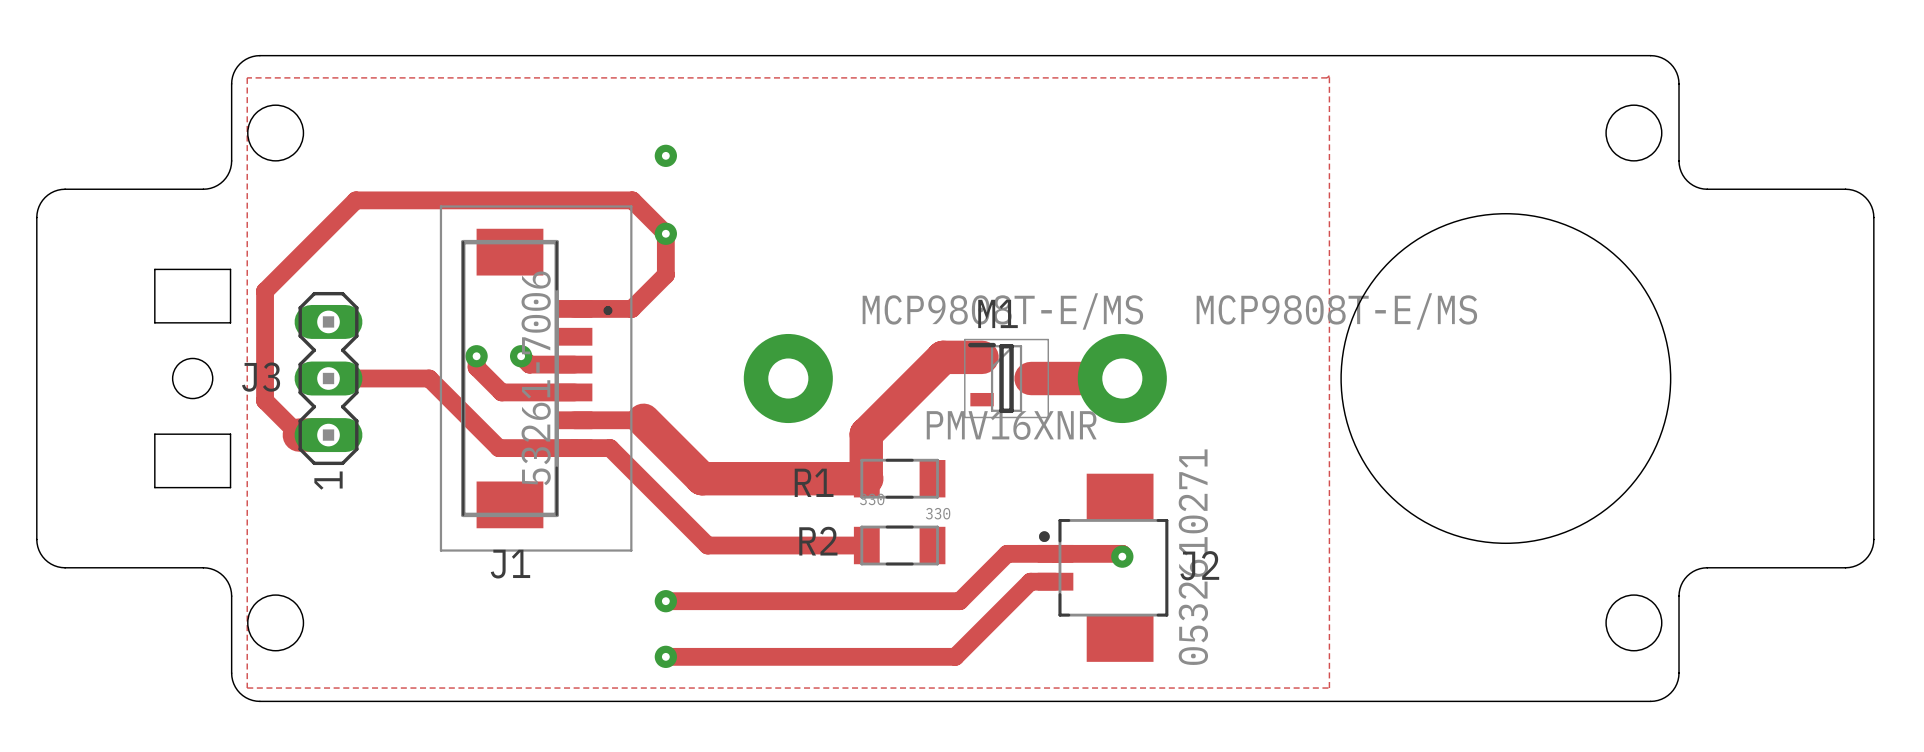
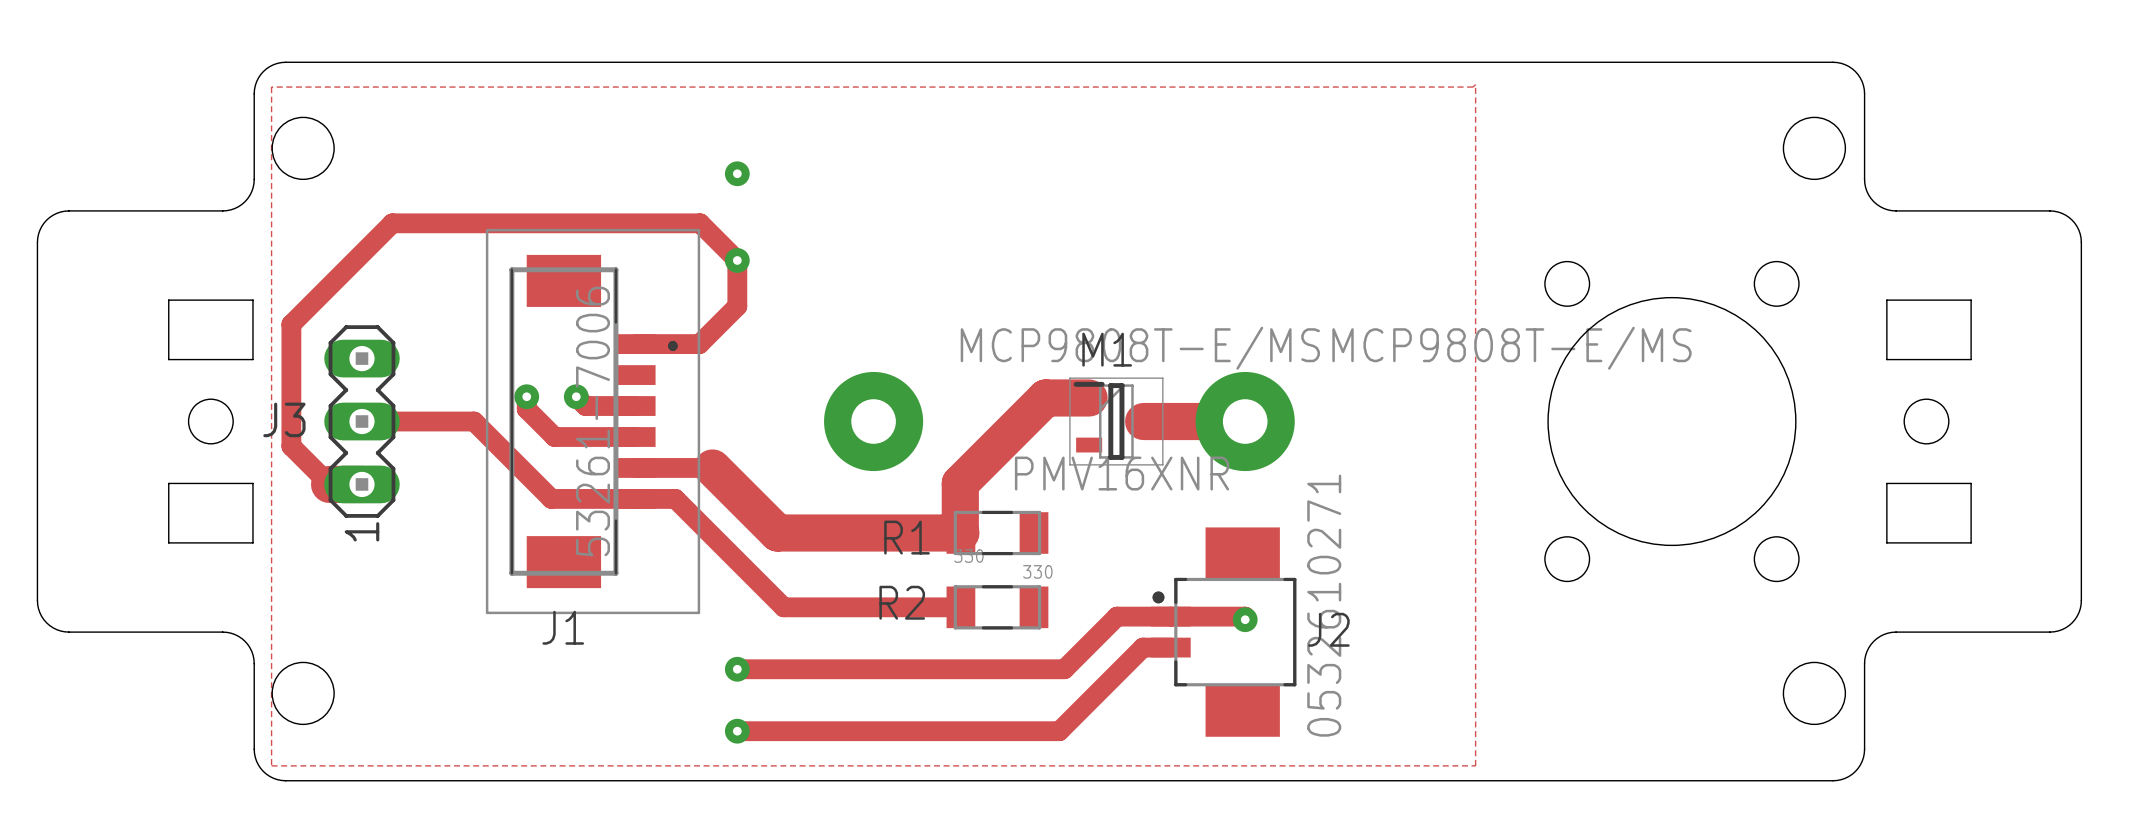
round board edge size: [1341, 213, 1671, 544] -> [1548, 297, 1796, 546]
round board edge: none -> [1544, 261, 1590, 307]
round board edge: none -> [1754, 261, 1799, 307]
board edge: none -> (1886, 300) (1886, 359) (1971, 359) (1971, 300) (1886, 300)
round board edge: none -> [1904, 399, 1949, 444]
board edge: none -> (1886, 483) (1886, 542) (1971, 542) (1971, 483) (1886, 483)
round board edge: none -> [1544, 536, 1590, 582]
round board edge: none -> [1754, 536, 1799, 582]

